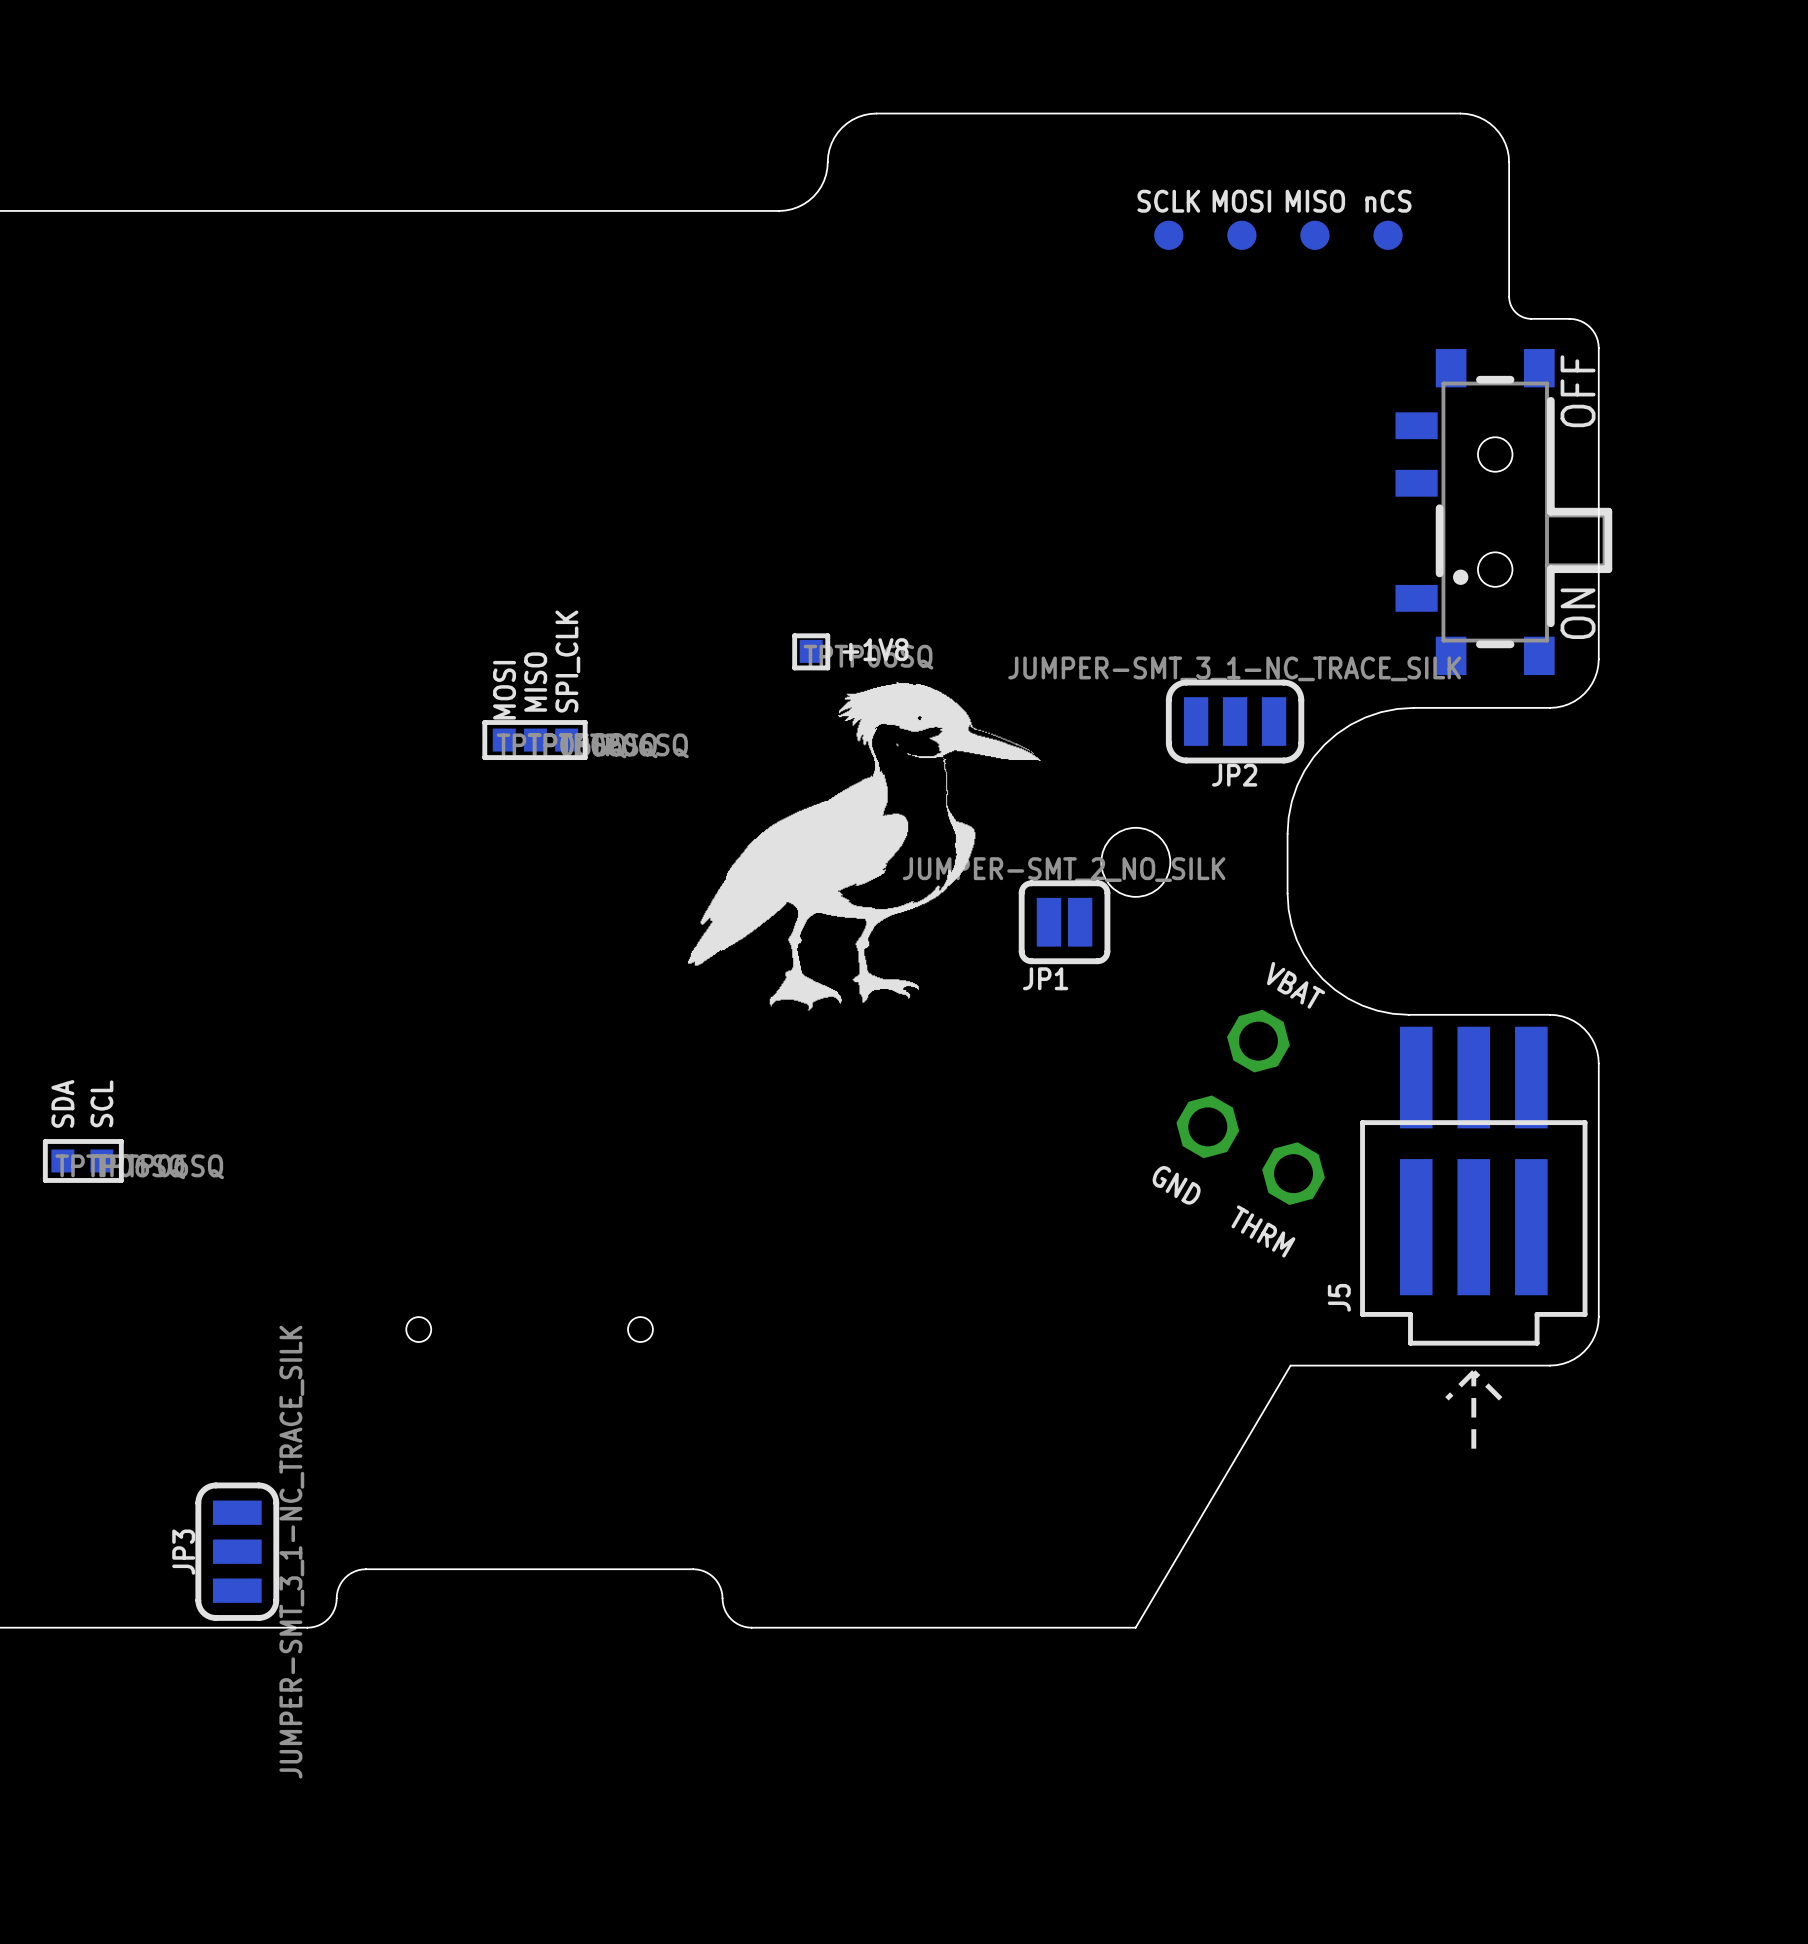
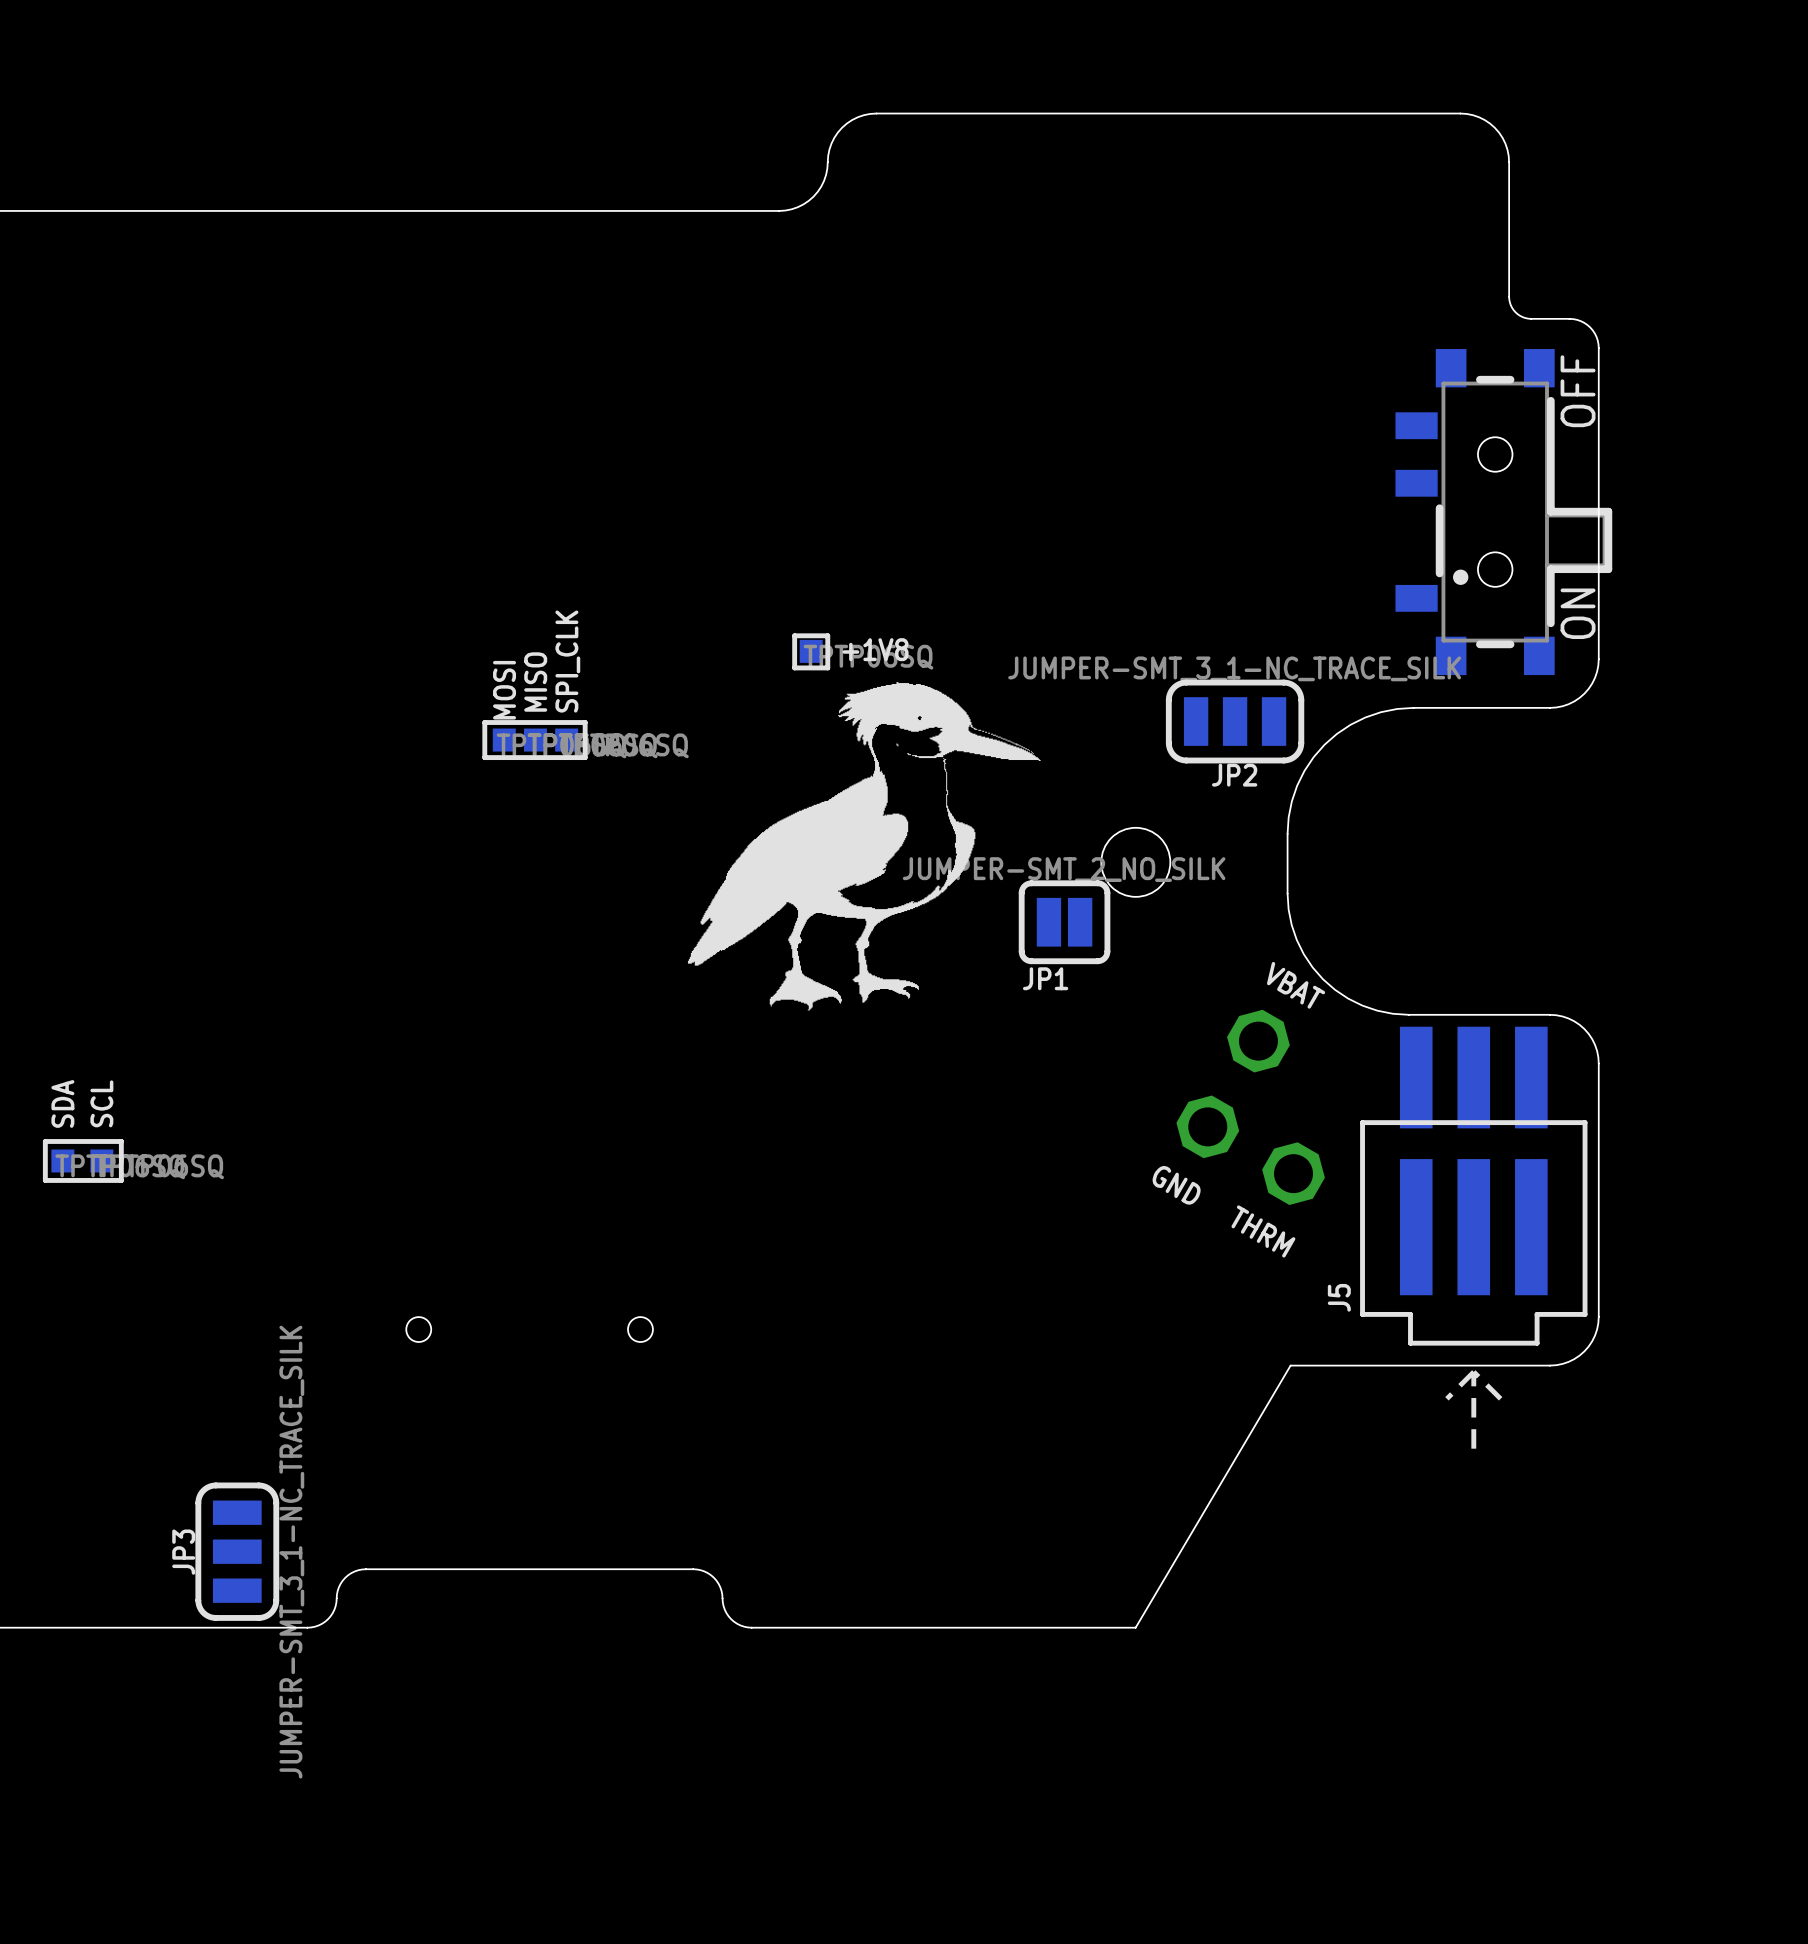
text: SCLK (1168, 201) -> none
text: MOSI (1241, 201) -> none
text: MISO (1315, 201) -> none
text: nCS (1388, 201) -> none
part: (1168, 235) -> none
part: (1241, 235) -> none
part: (1314, 235) -> none
part: (1388, 235) -> none

